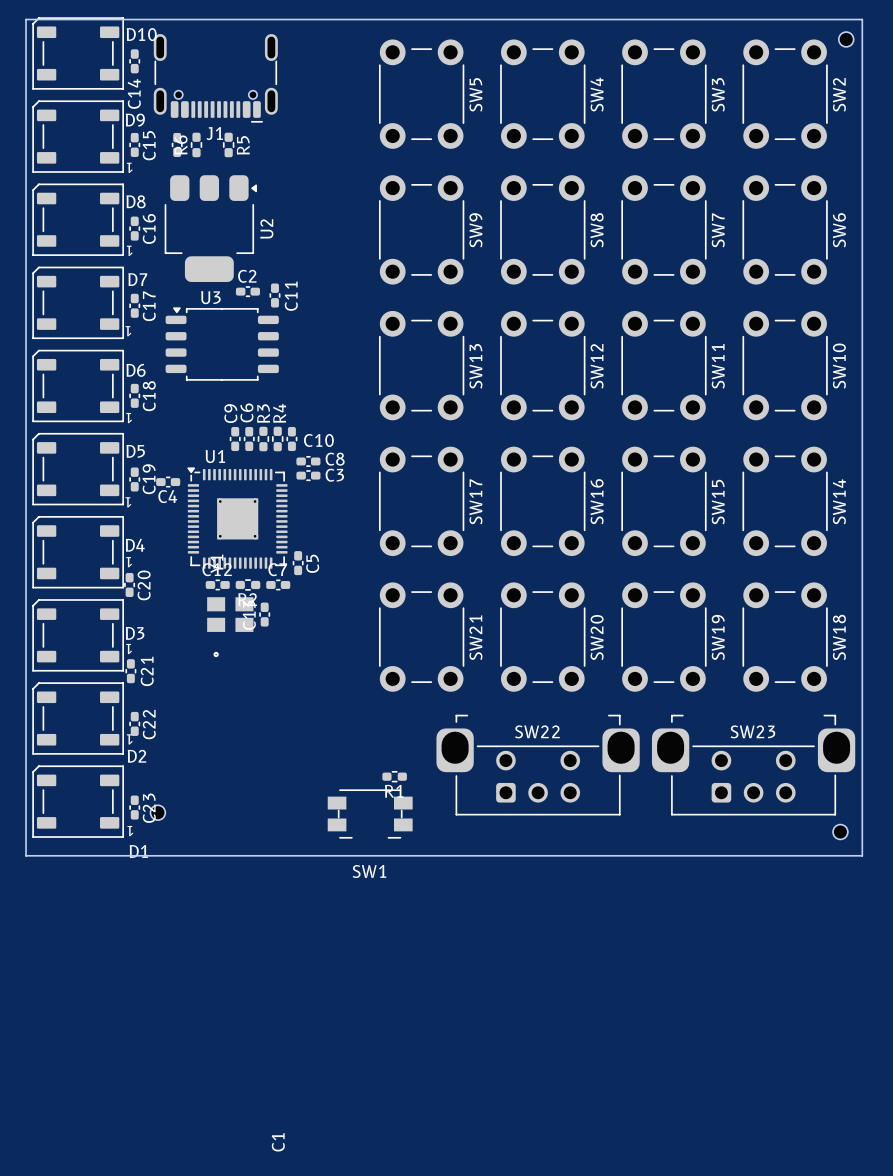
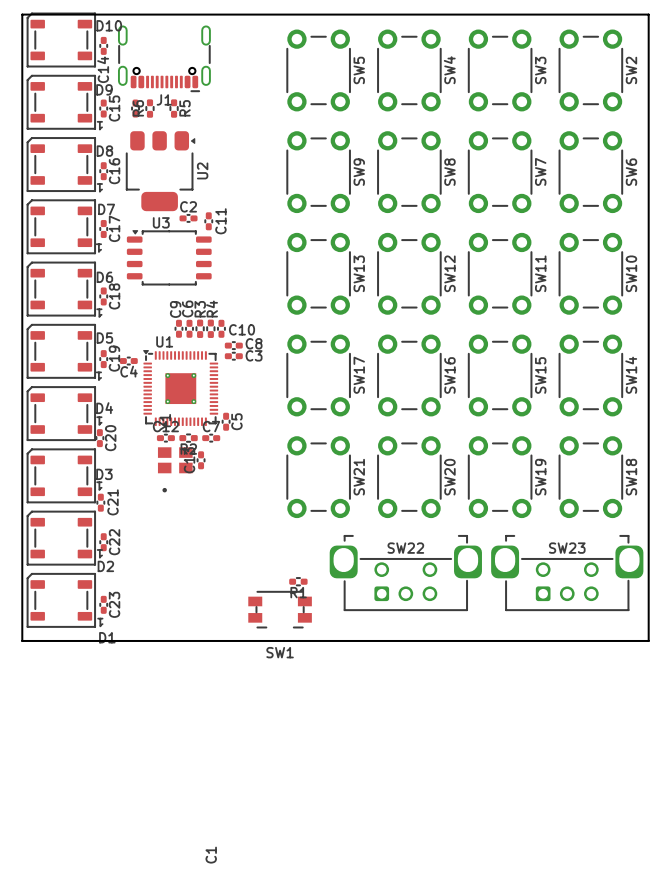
part: (846, 39) -> none
part: (157, 812) -> none
part: (840, 832) -> none

